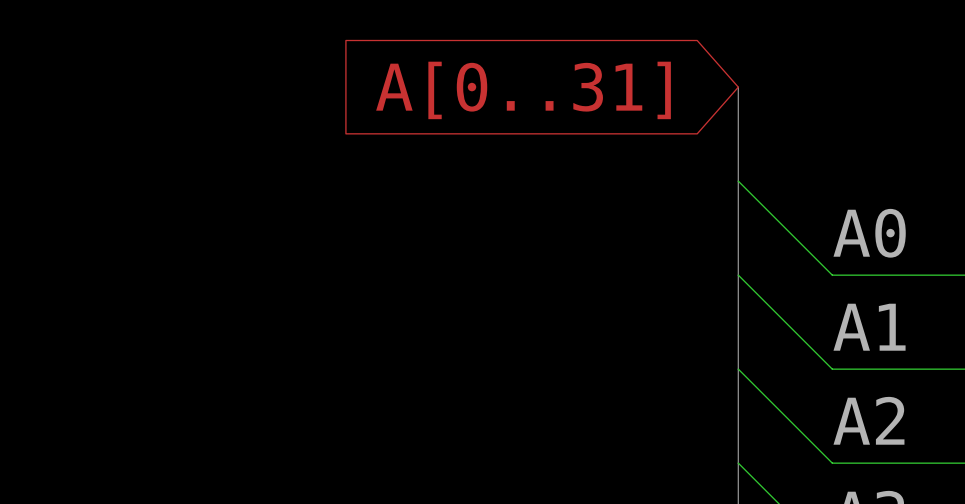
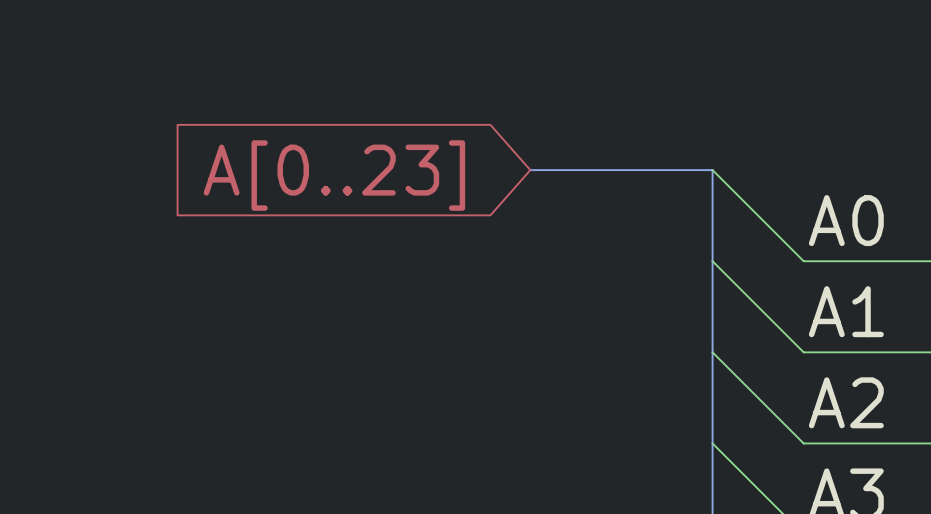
bus: (738, 87) (738, 181) -> (530, 170) (712, 170)
global label: A[0..31] (523, 90) -> A[0..23] (334, 175)

